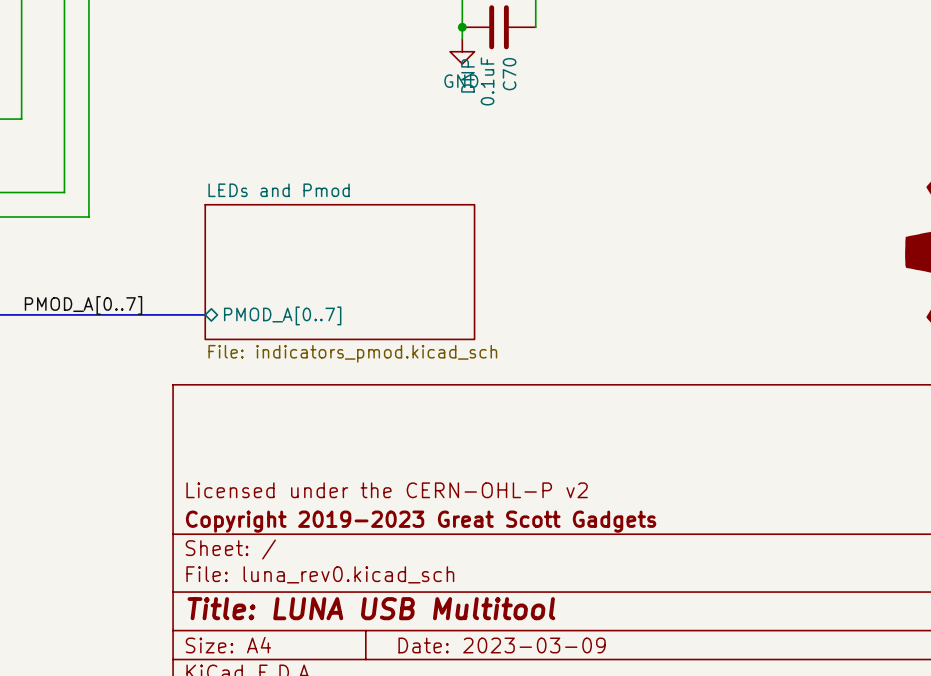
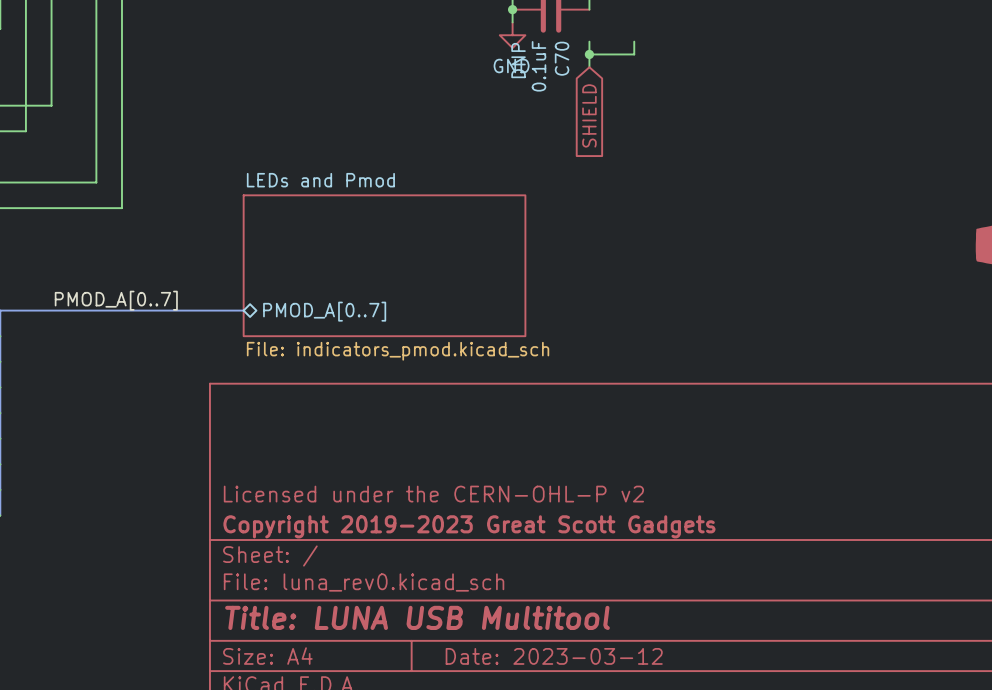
wire: none -> (589, 41) (589, 67)
wire: none -> (634, 41) (634, 54) (589, 54)
junction: none -> (589, 54)
global label: none -> SHIELD (589, 115)
title block: Date: 2023-03-09 (502, 645) -> Date: 2023-03-12 (554, 656)

